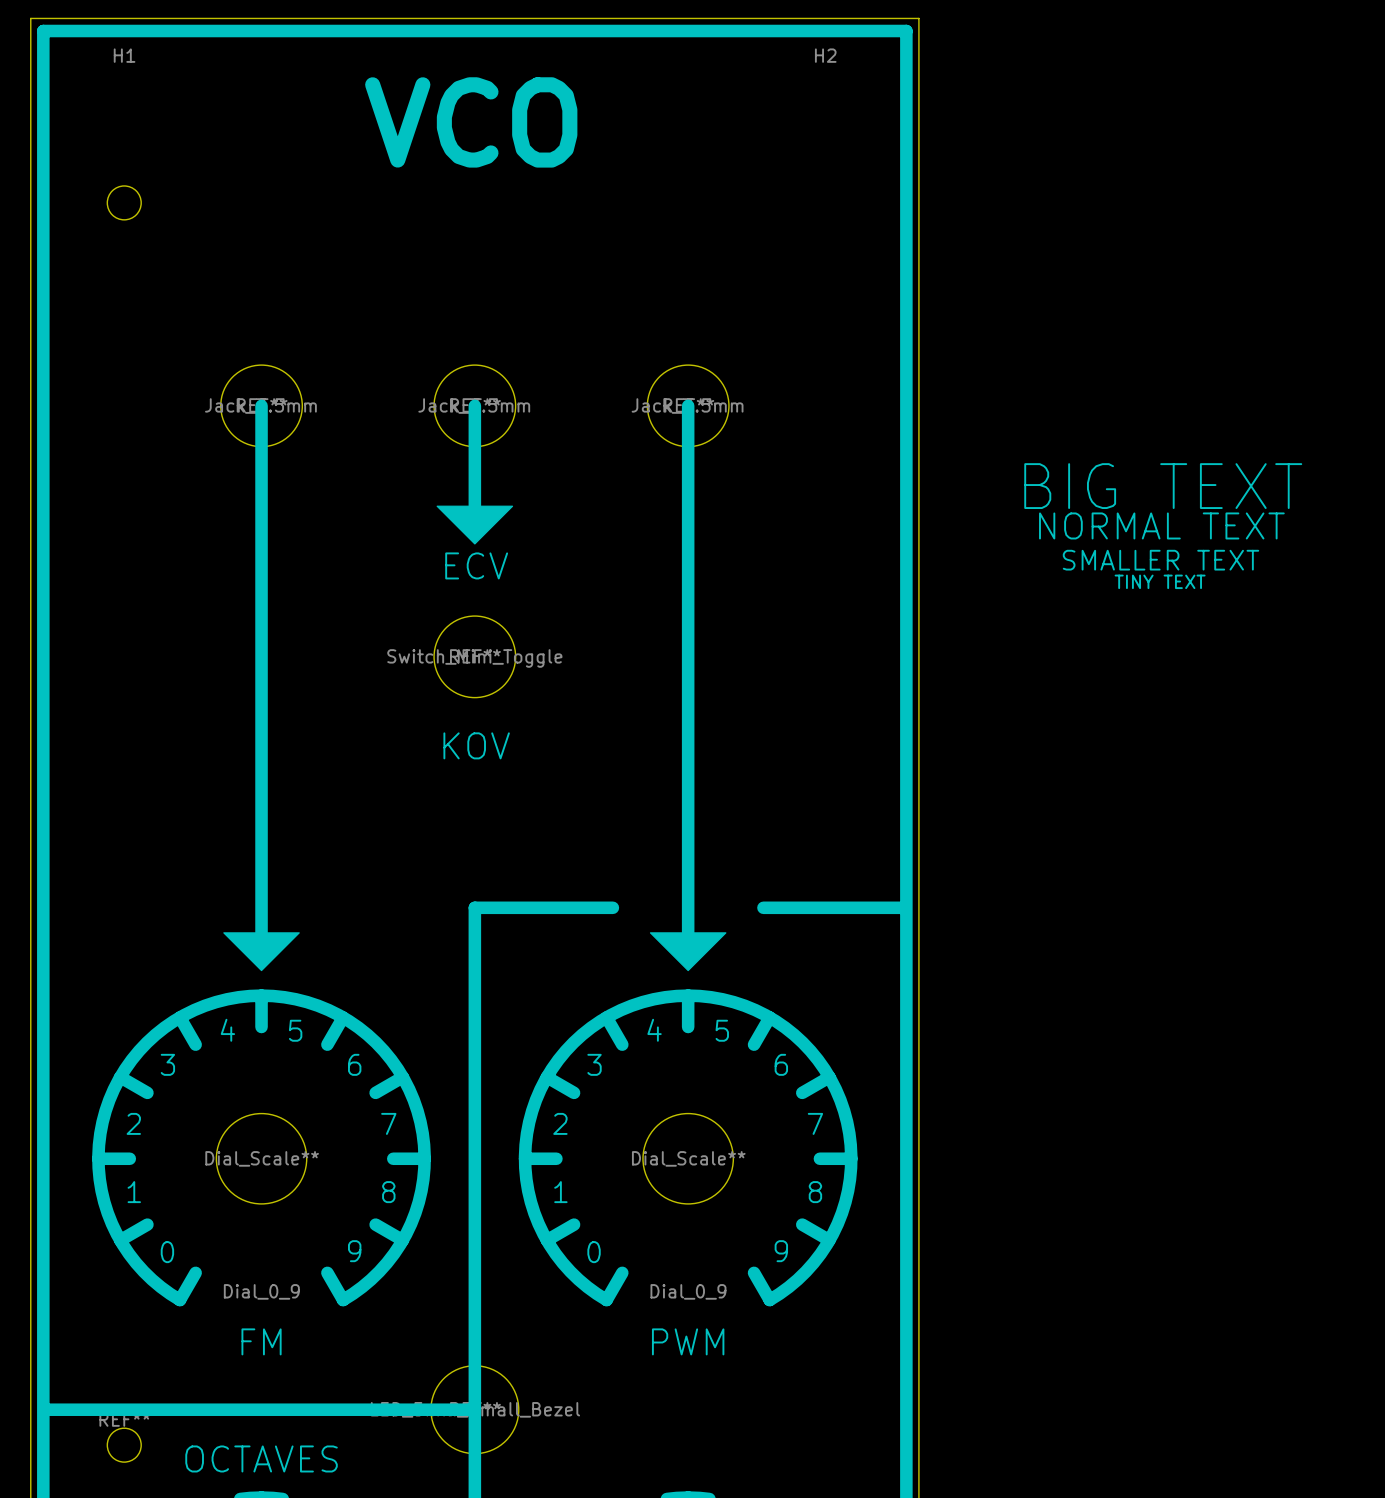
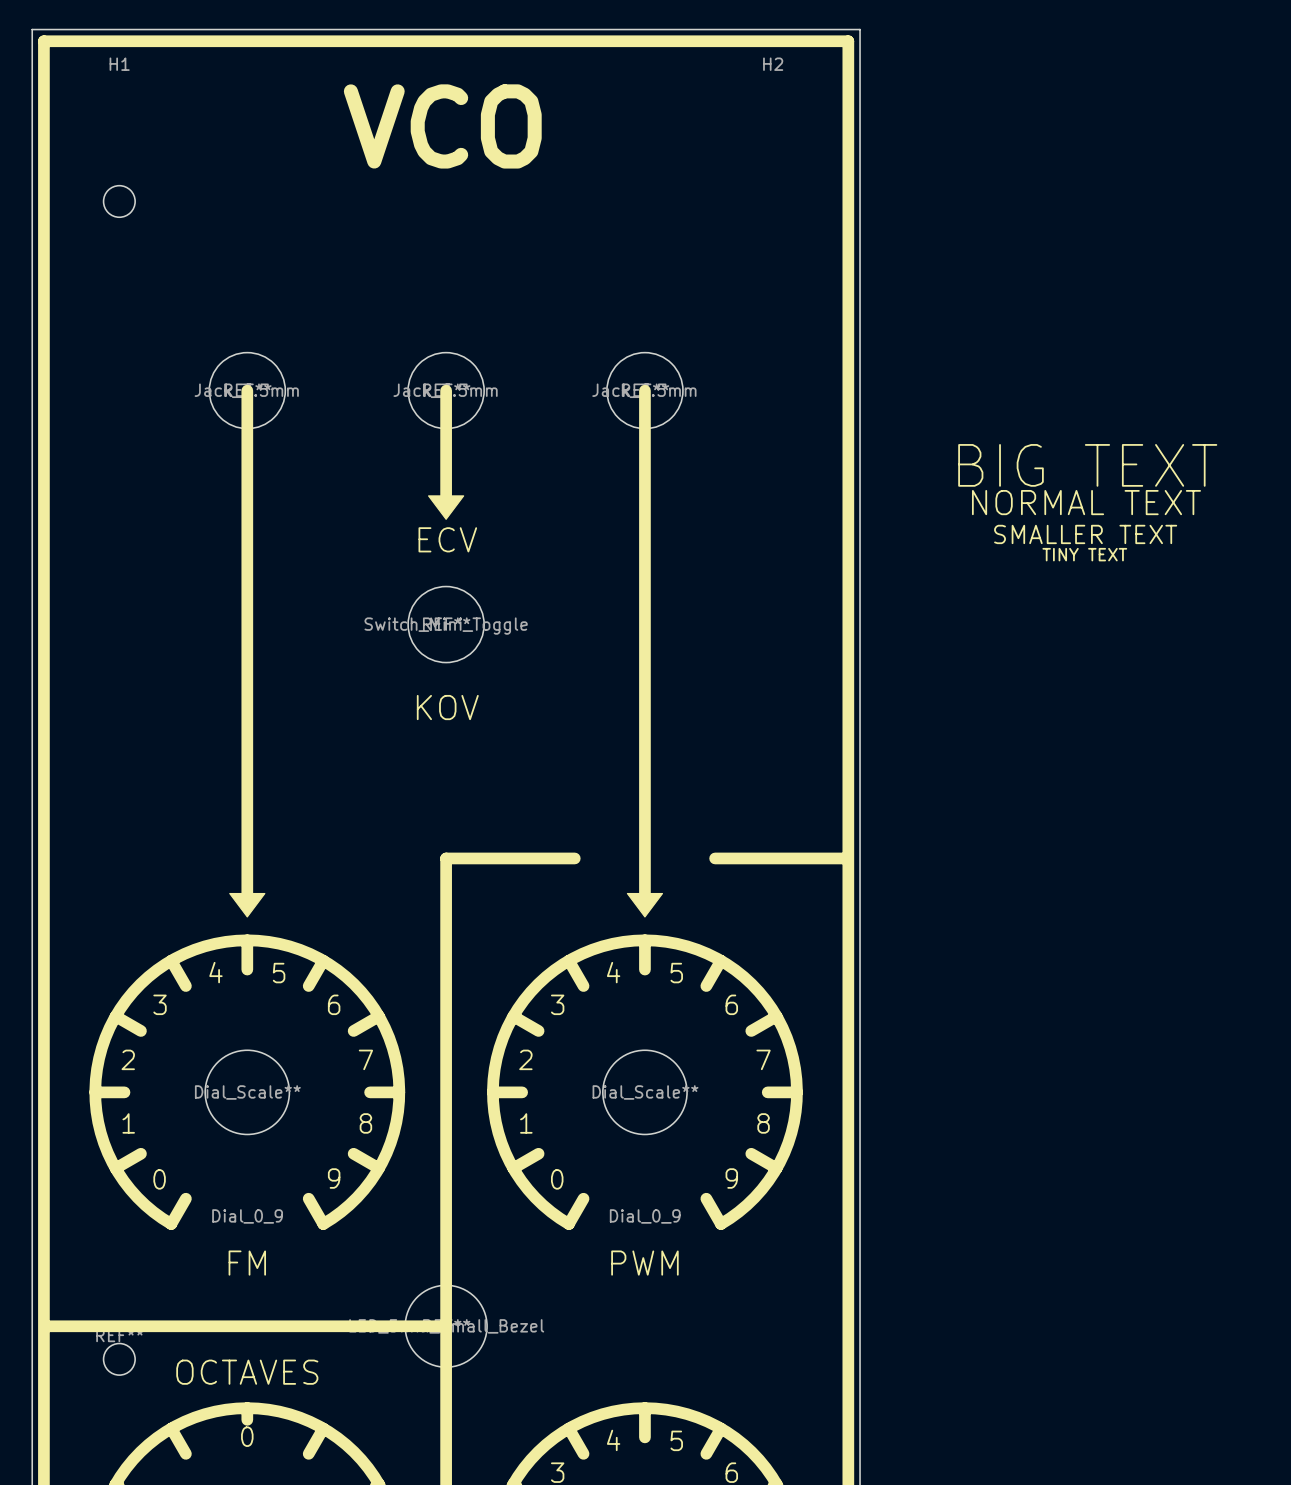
drawing shape: [436, 505, 514, 545] -> [427, 495, 465, 520]
drawing shape: [223, 932, 300, 972] -> [229, 892, 266, 918]
drawing shape: [649, 932, 727, 972] -> [626, 892, 664, 918]

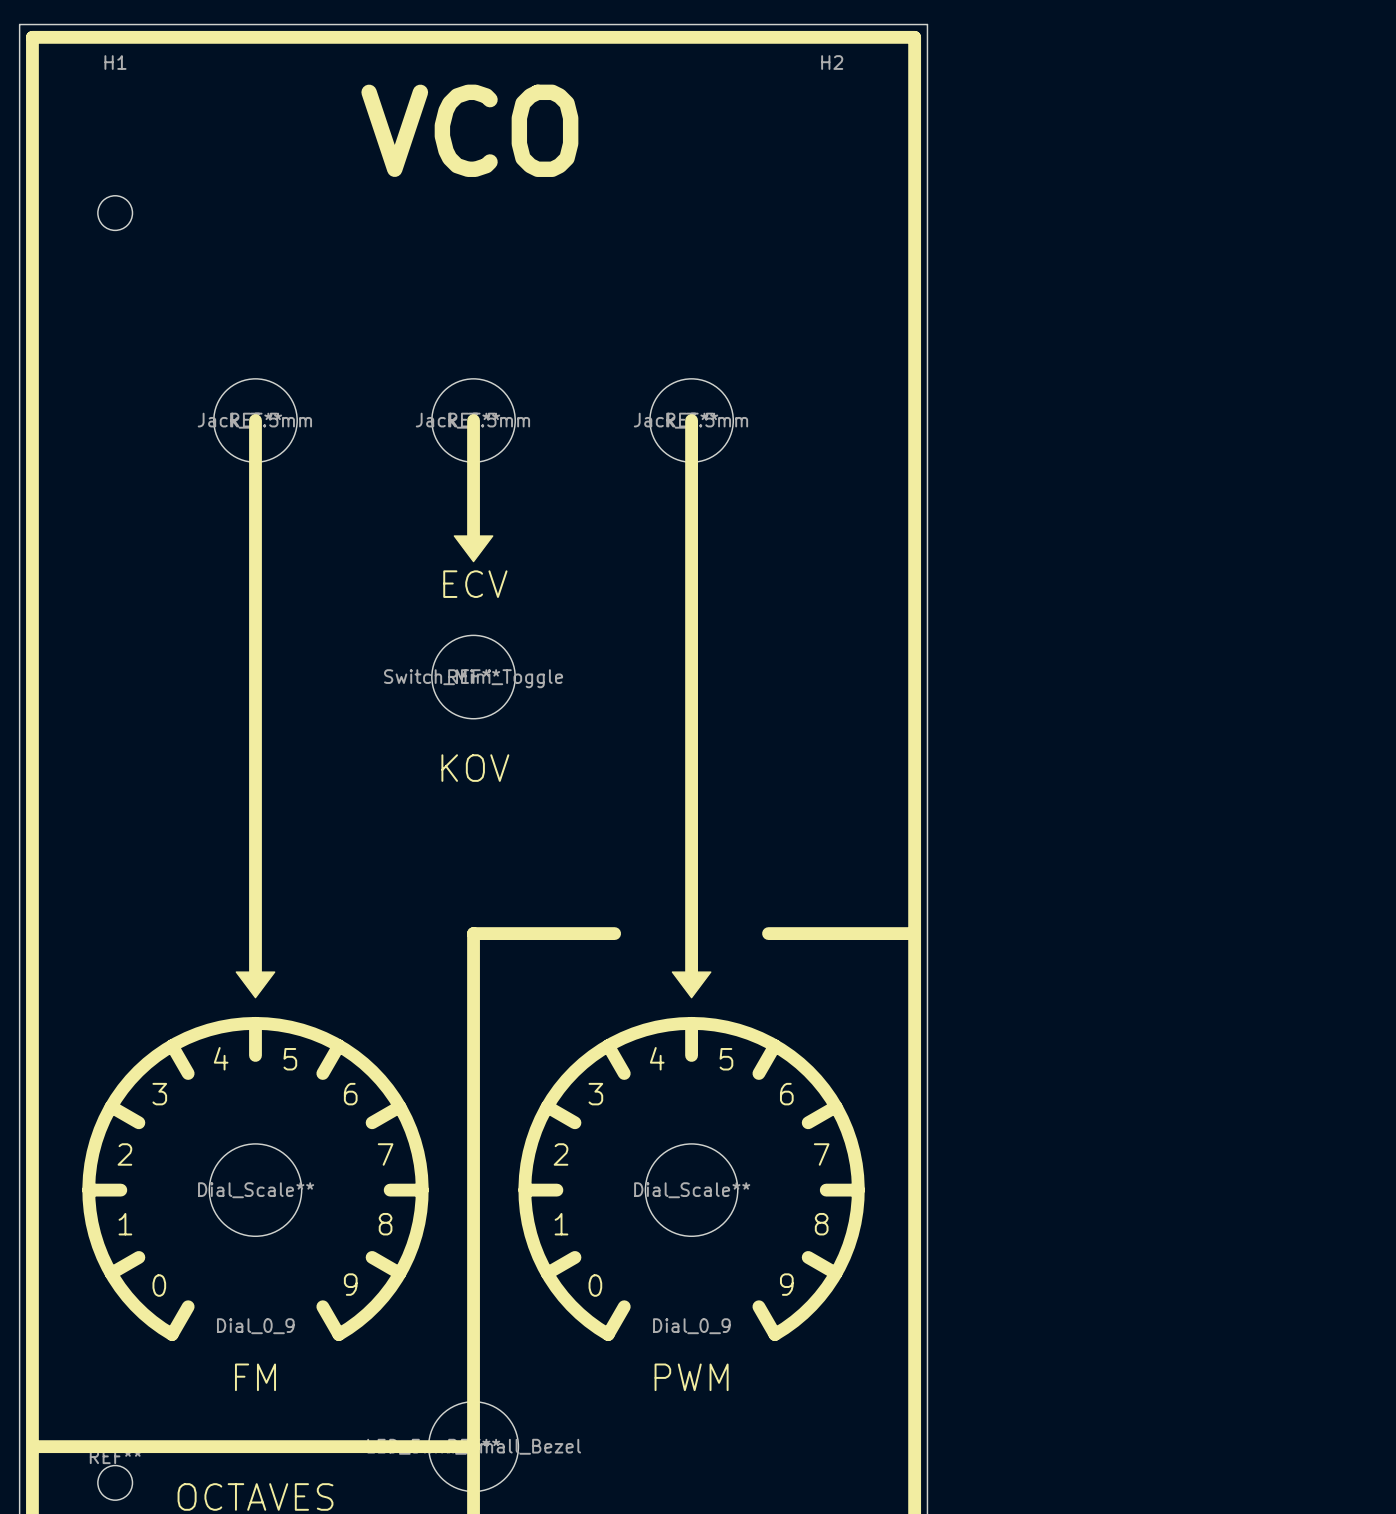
text: BIG TEXT (1087, 465) -> none
text: NORMAL TEXT (1086, 502) -> none
text: SMALLER TEXT (1085, 534) -> none
text: TINY TEXT (1084, 554) -> none

